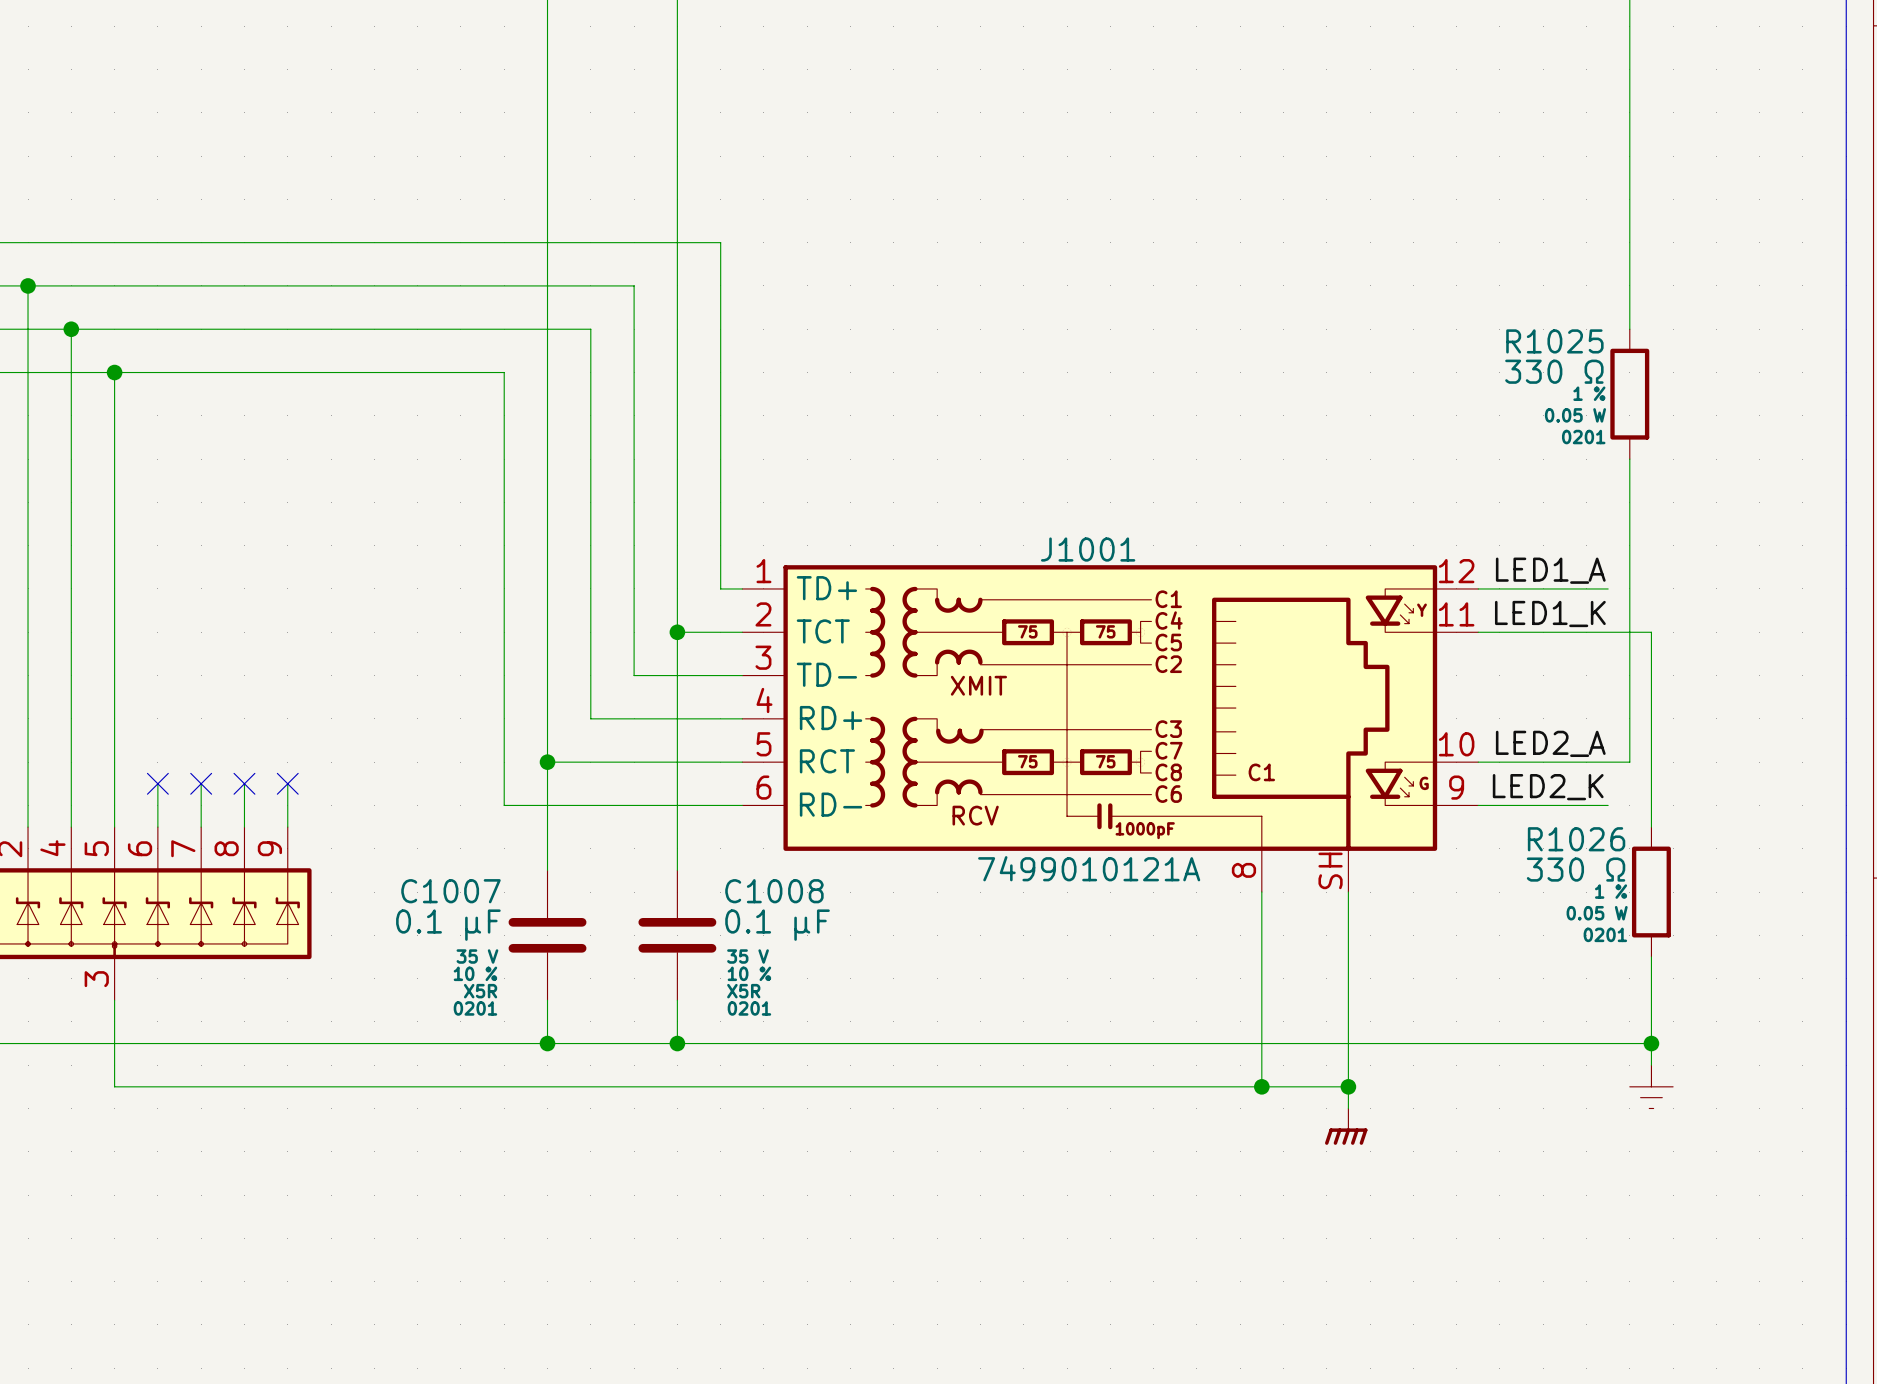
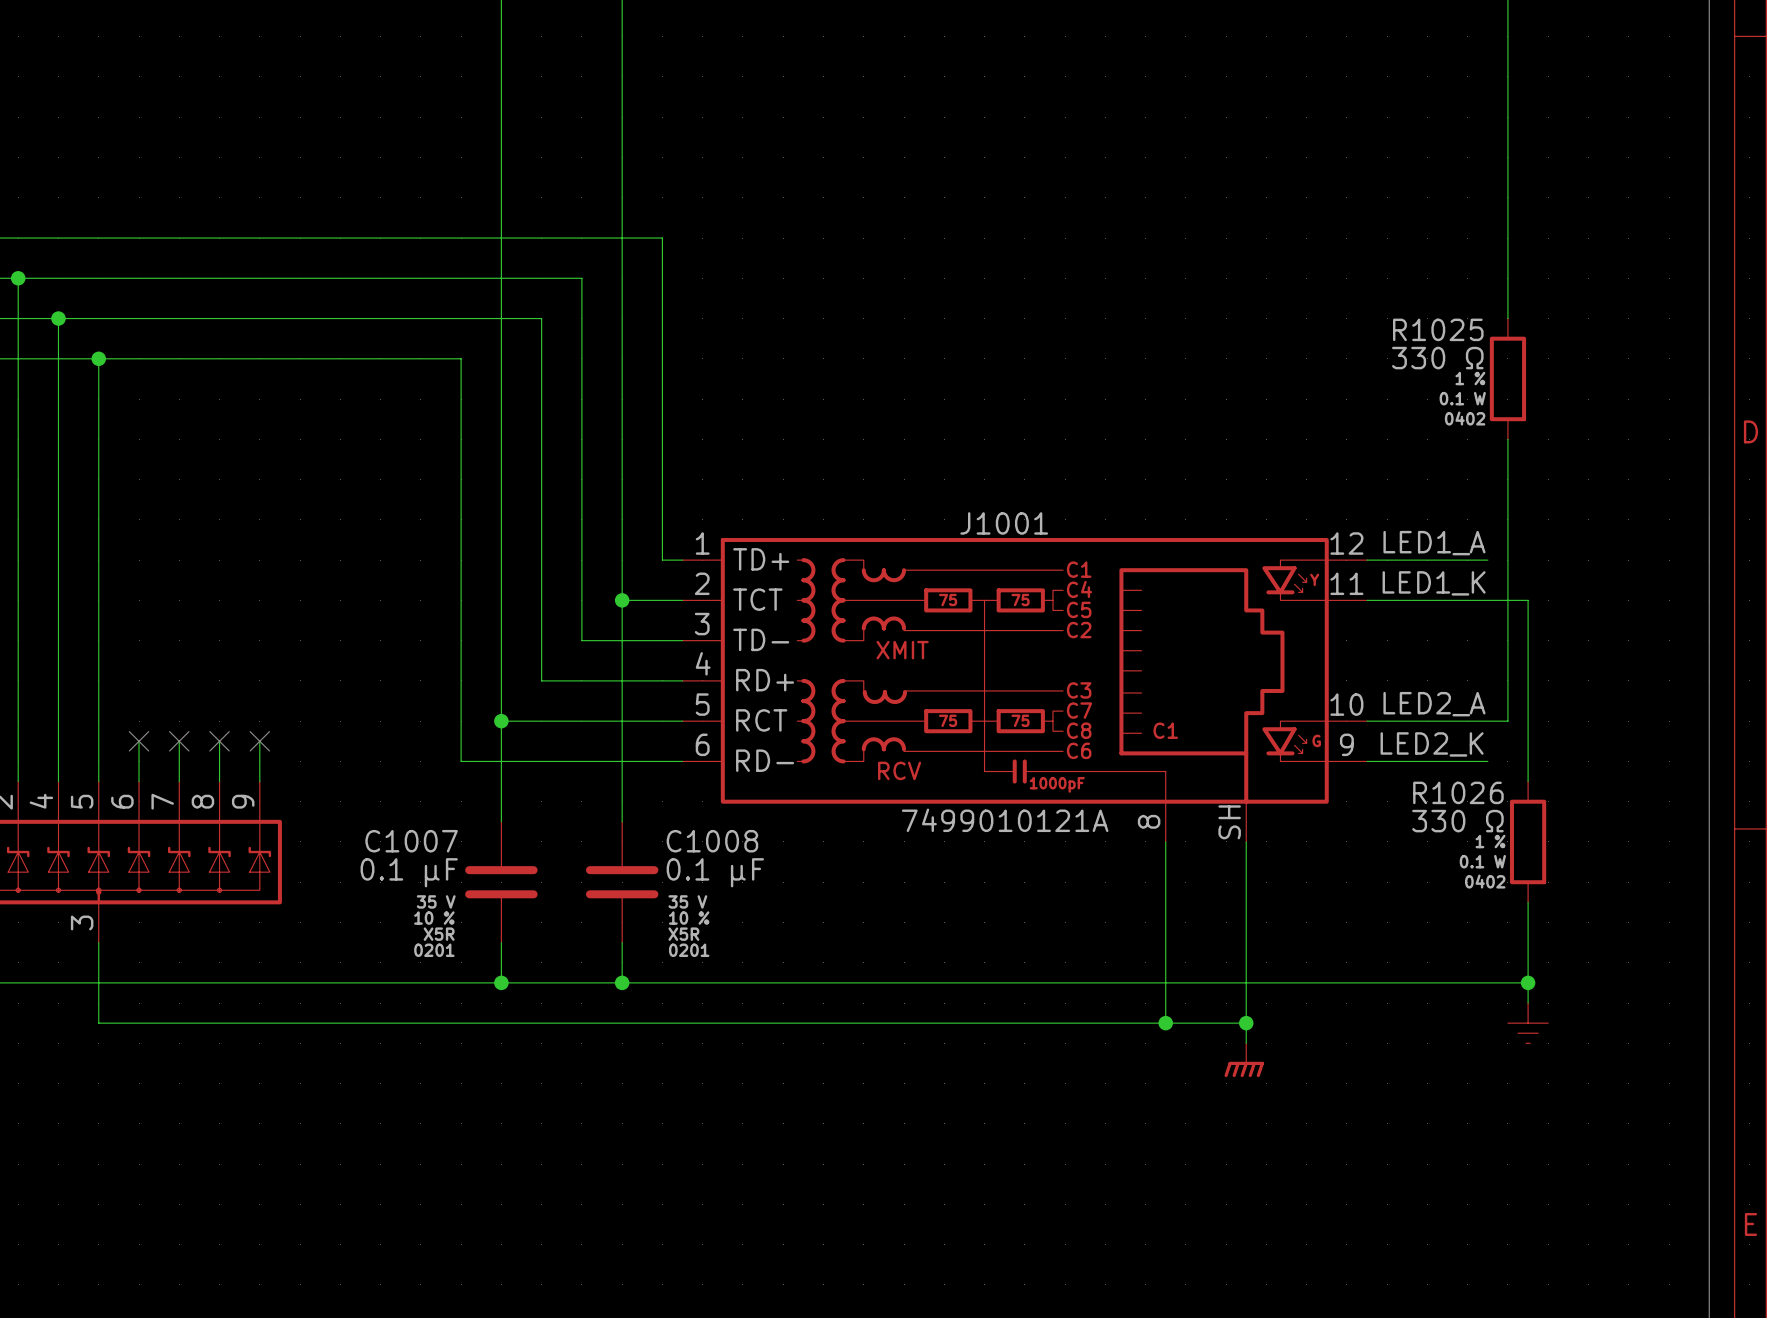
R1025 text: 0.05 W (1575, 415) -> 0.1 W (1462, 398)
R1025 text: 0201 (1583, 437) -> 0402 (1465, 418)
R1026 text: 0.05 W (1597, 913) -> 0.1 W (1482, 861)
R1026 text: 0201 (1605, 934) -> 0402 (1485, 881)

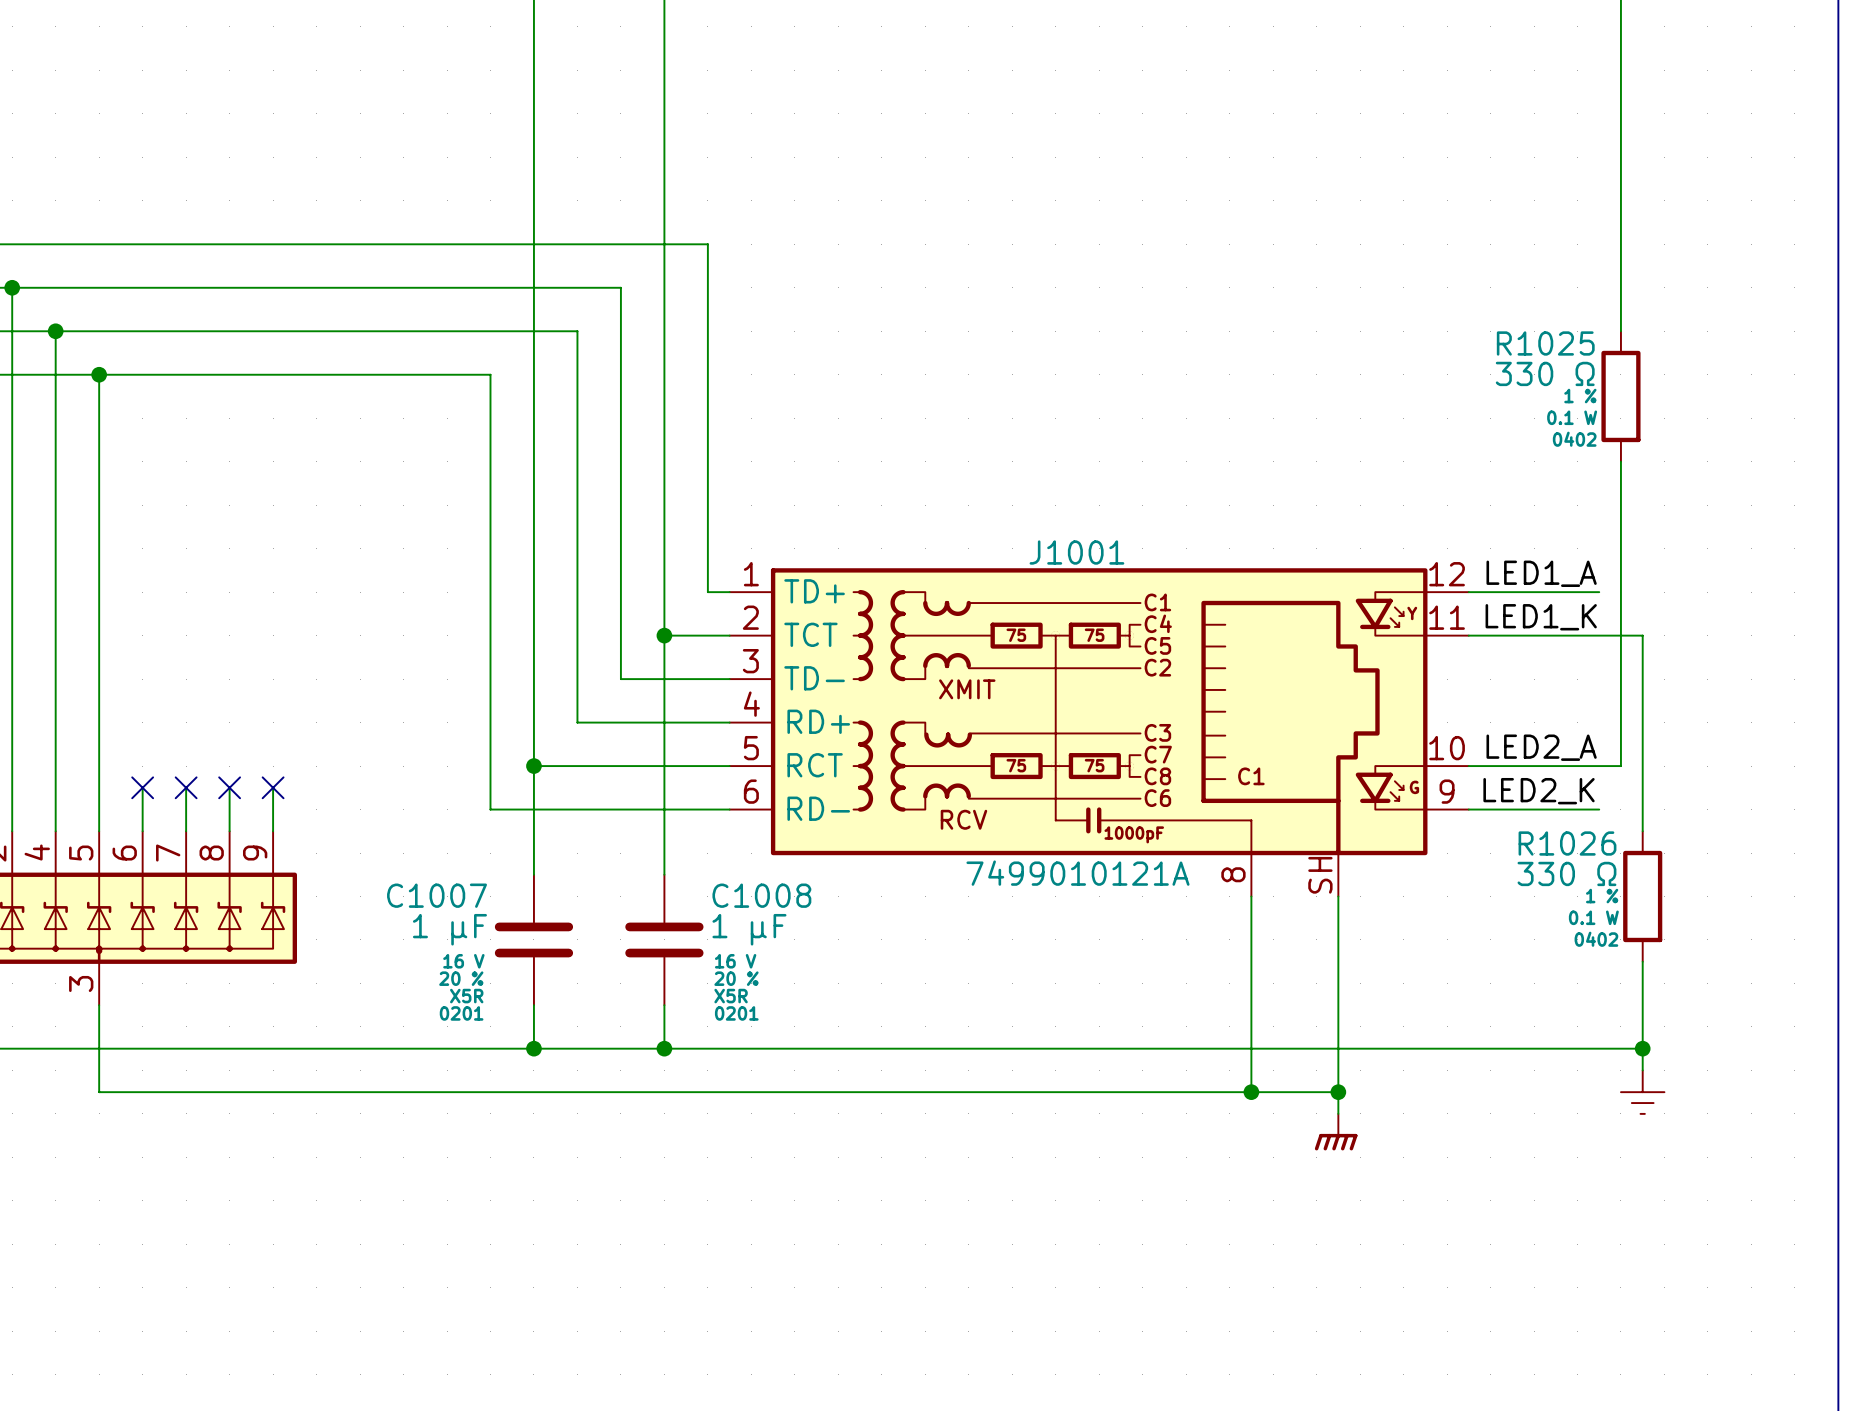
C1007 value: 0.1 µF (409, 872) -> 1 µF (449, 929)
C1008 value: 0.1 µF (715, 872) -> 1 µF (749, 929)
C1007 text: 35 V (436, 901) -> 16 V (463, 961)
C1008 text: 35 V (687, 901) -> 16 V (735, 961)
C1007 text: 10 % (434, 918) -> 20 % (461, 978)
C1008 text: 10 % (689, 918) -> 20 % (736, 978)

